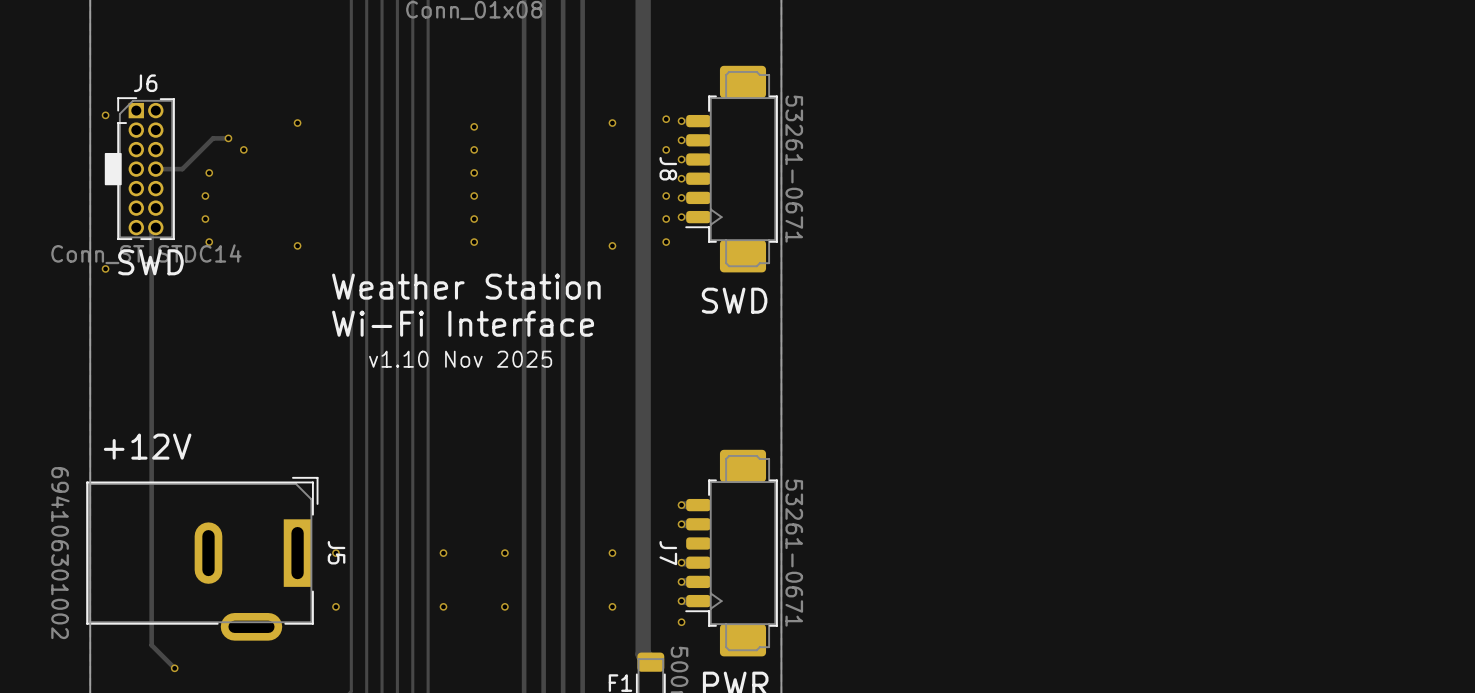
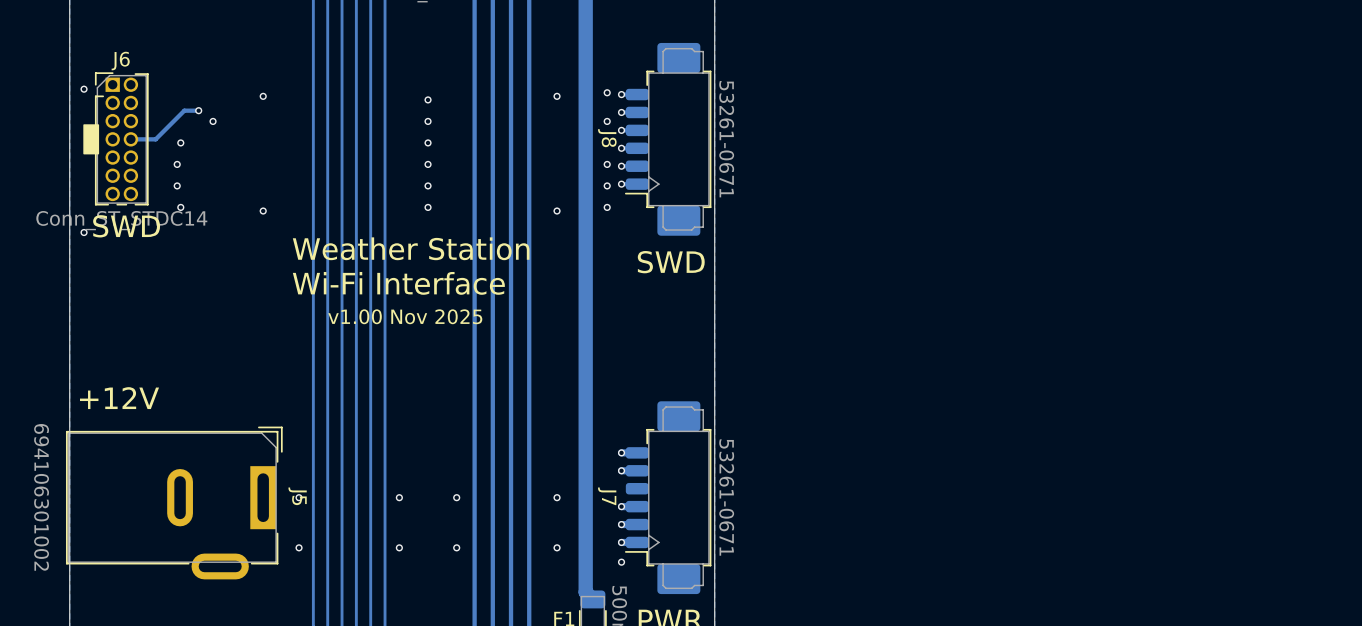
track: (155, 227) (151, 231) (151, 645) (174, 668) -> none
text: v1.10 Nov 2025 (460, 359) -> v1.00 Nov 2025 (405, 316)
via: (174, 668) -> none

